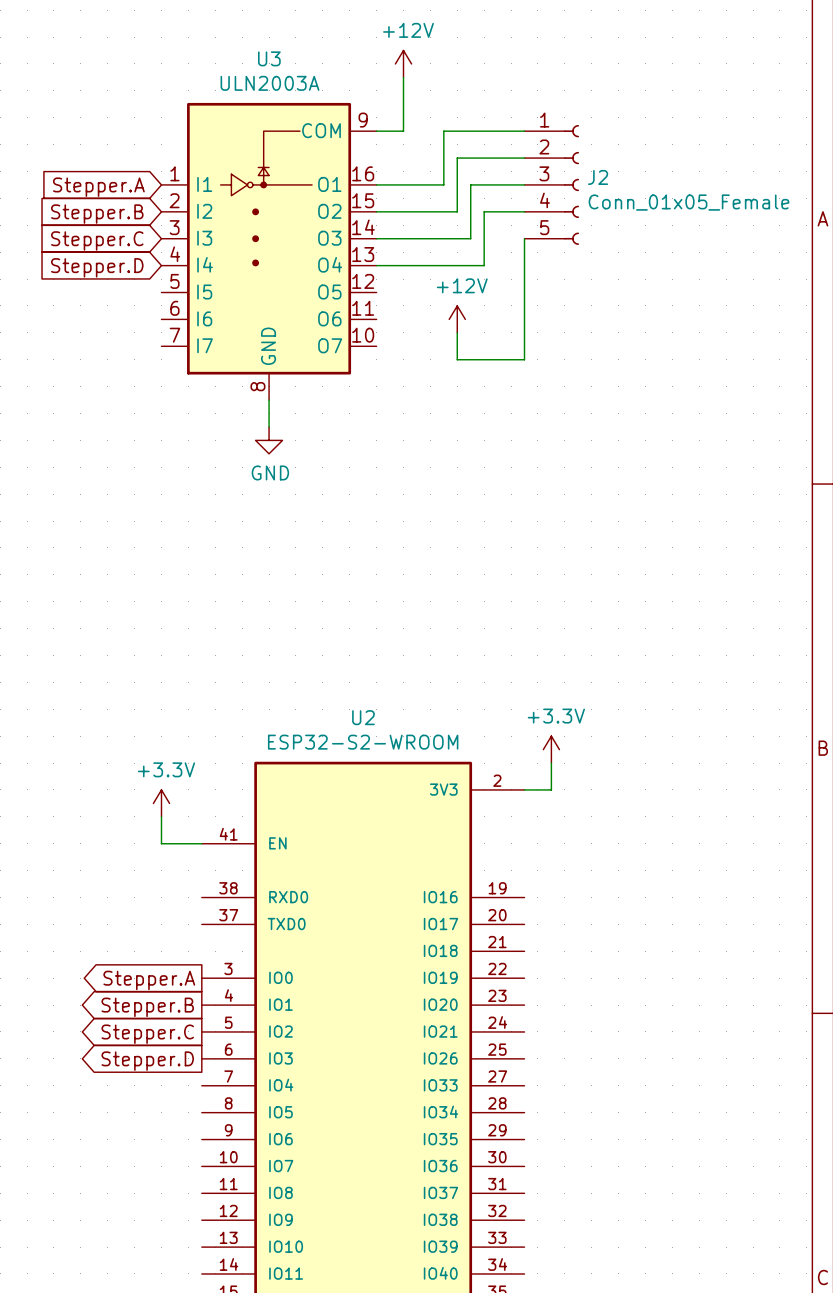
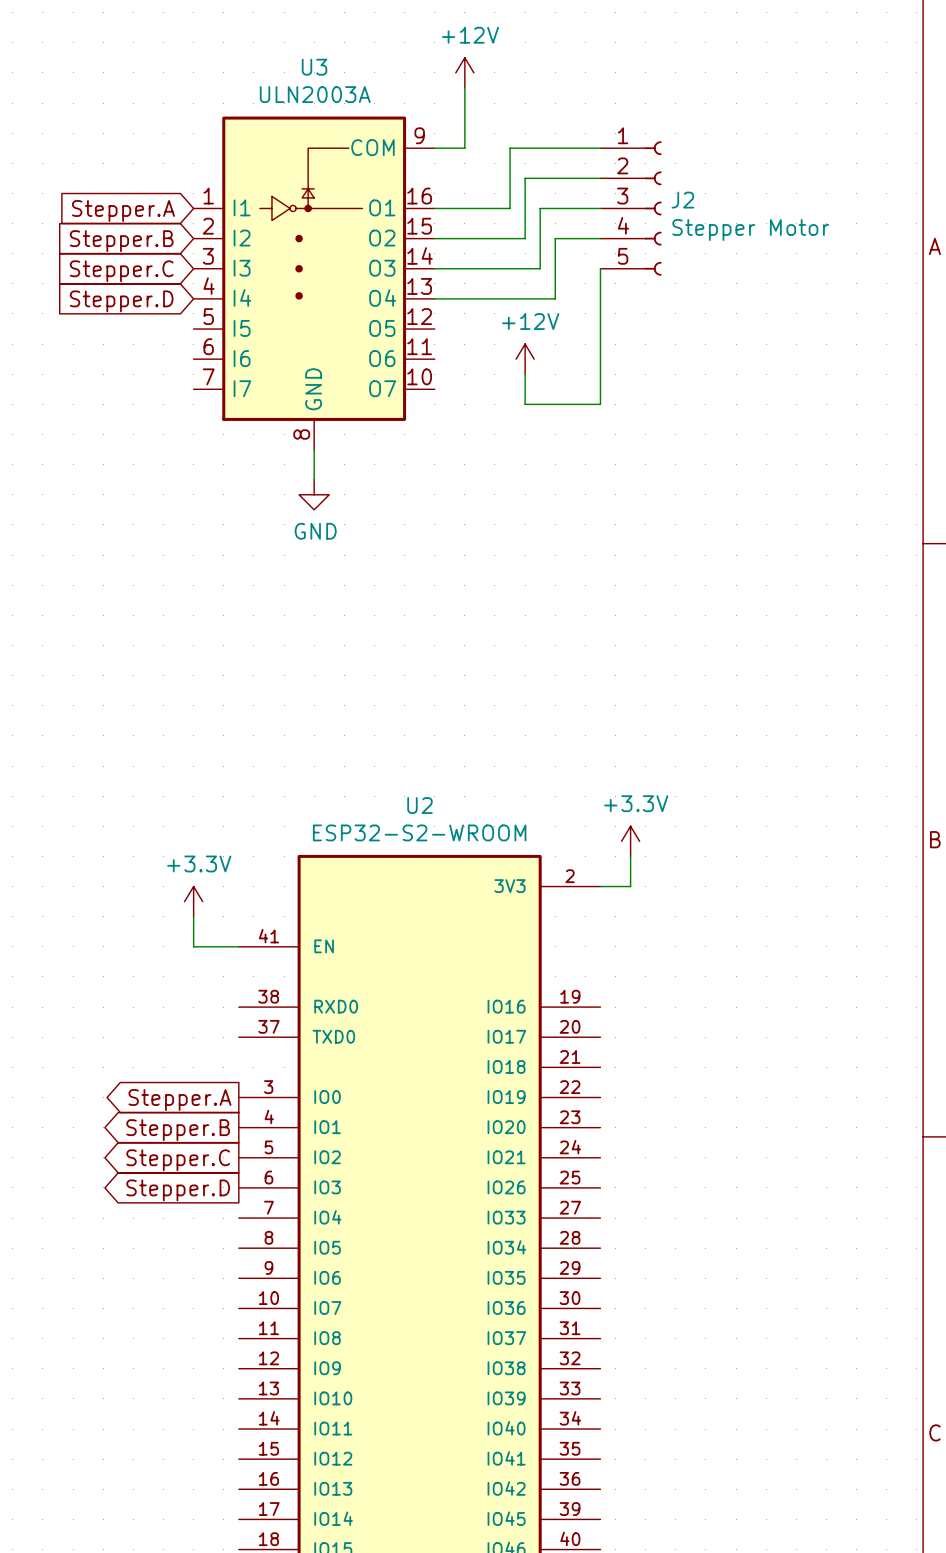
J2 value: Conn_01x05_Female (688, 202) -> Stepper Motor (750, 230)

